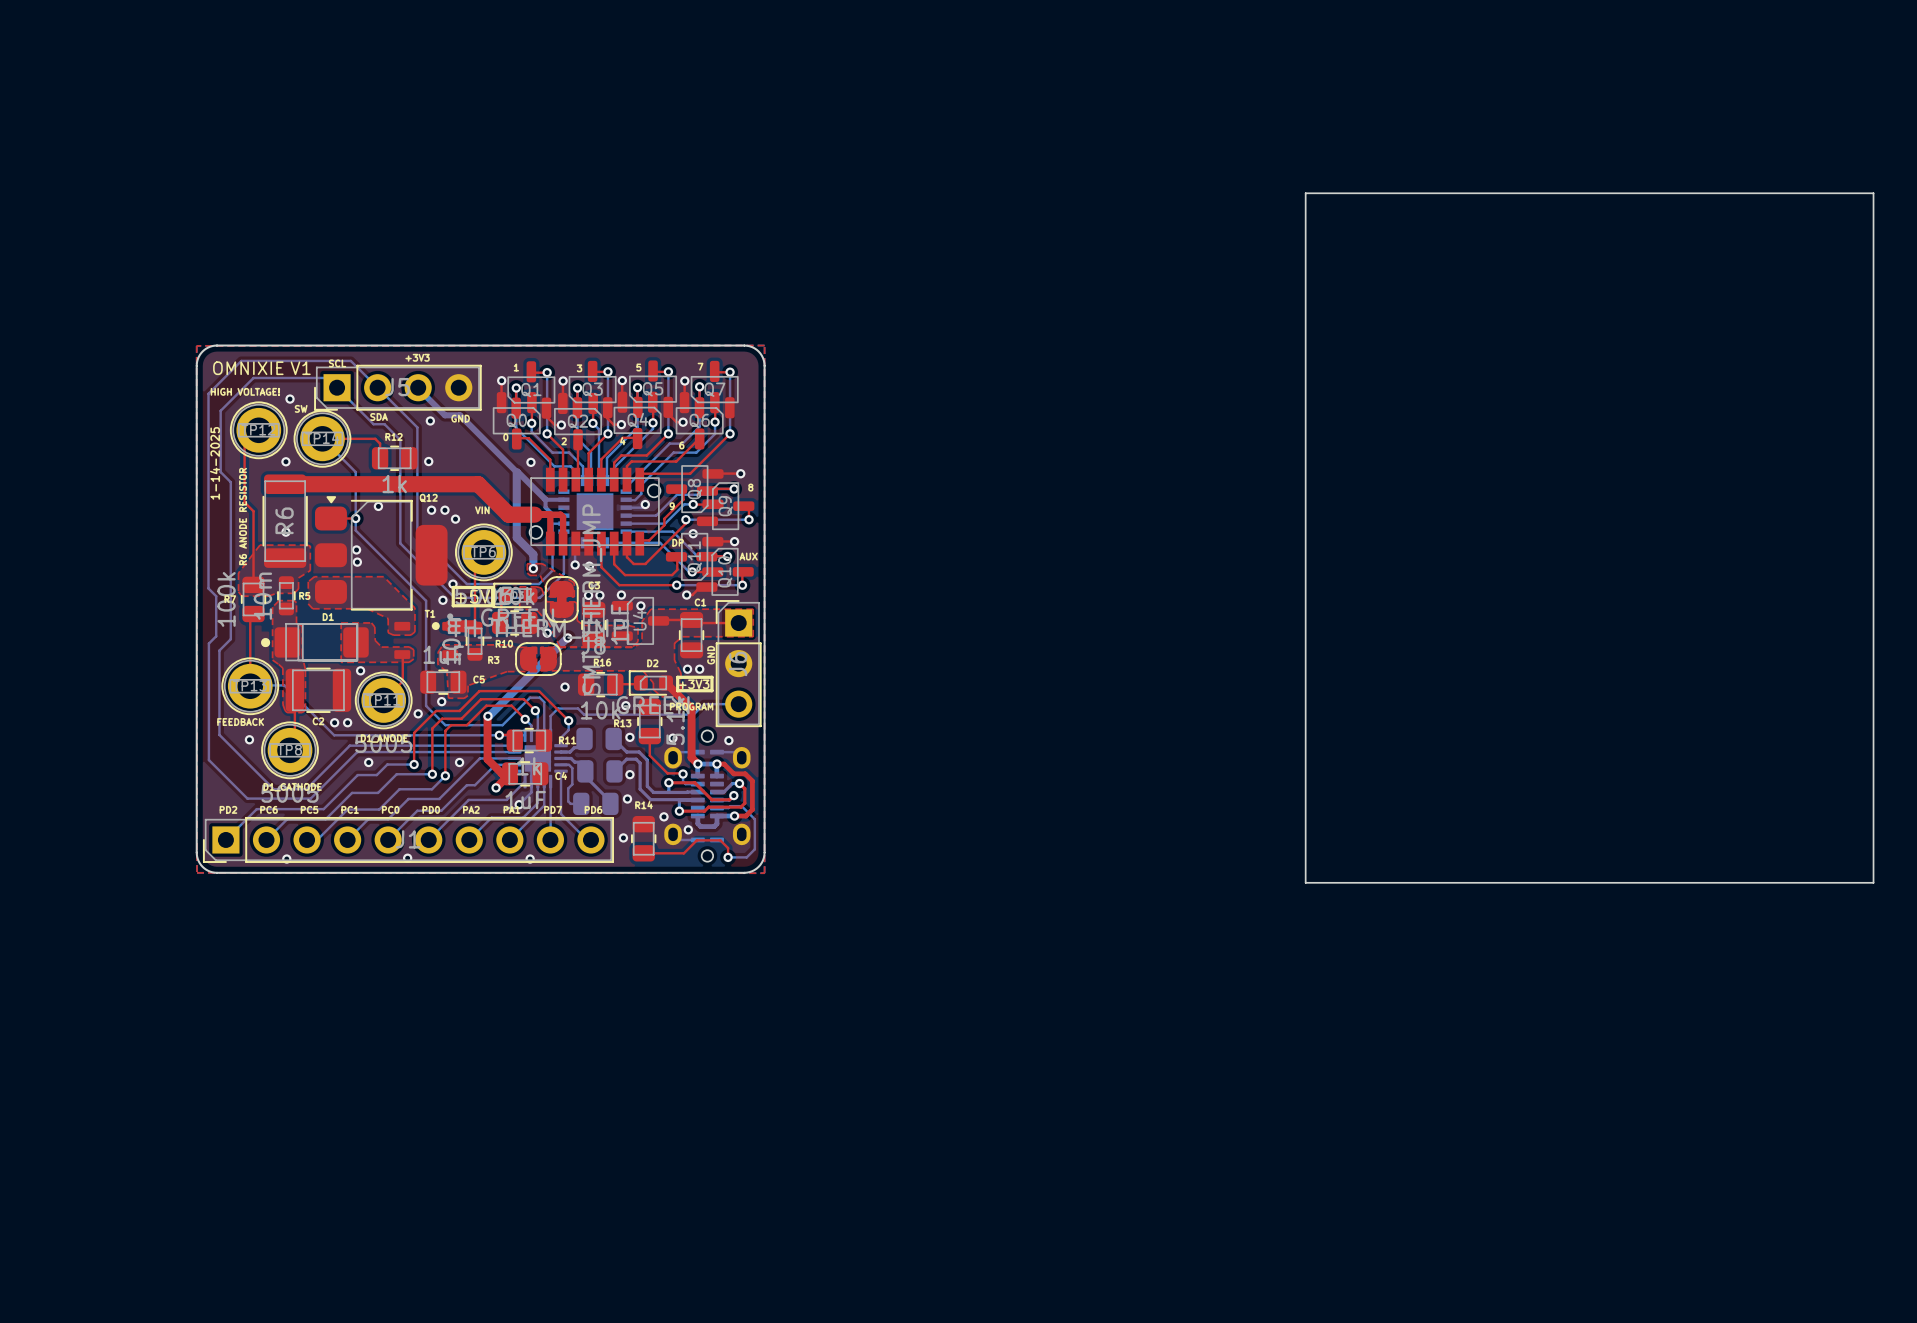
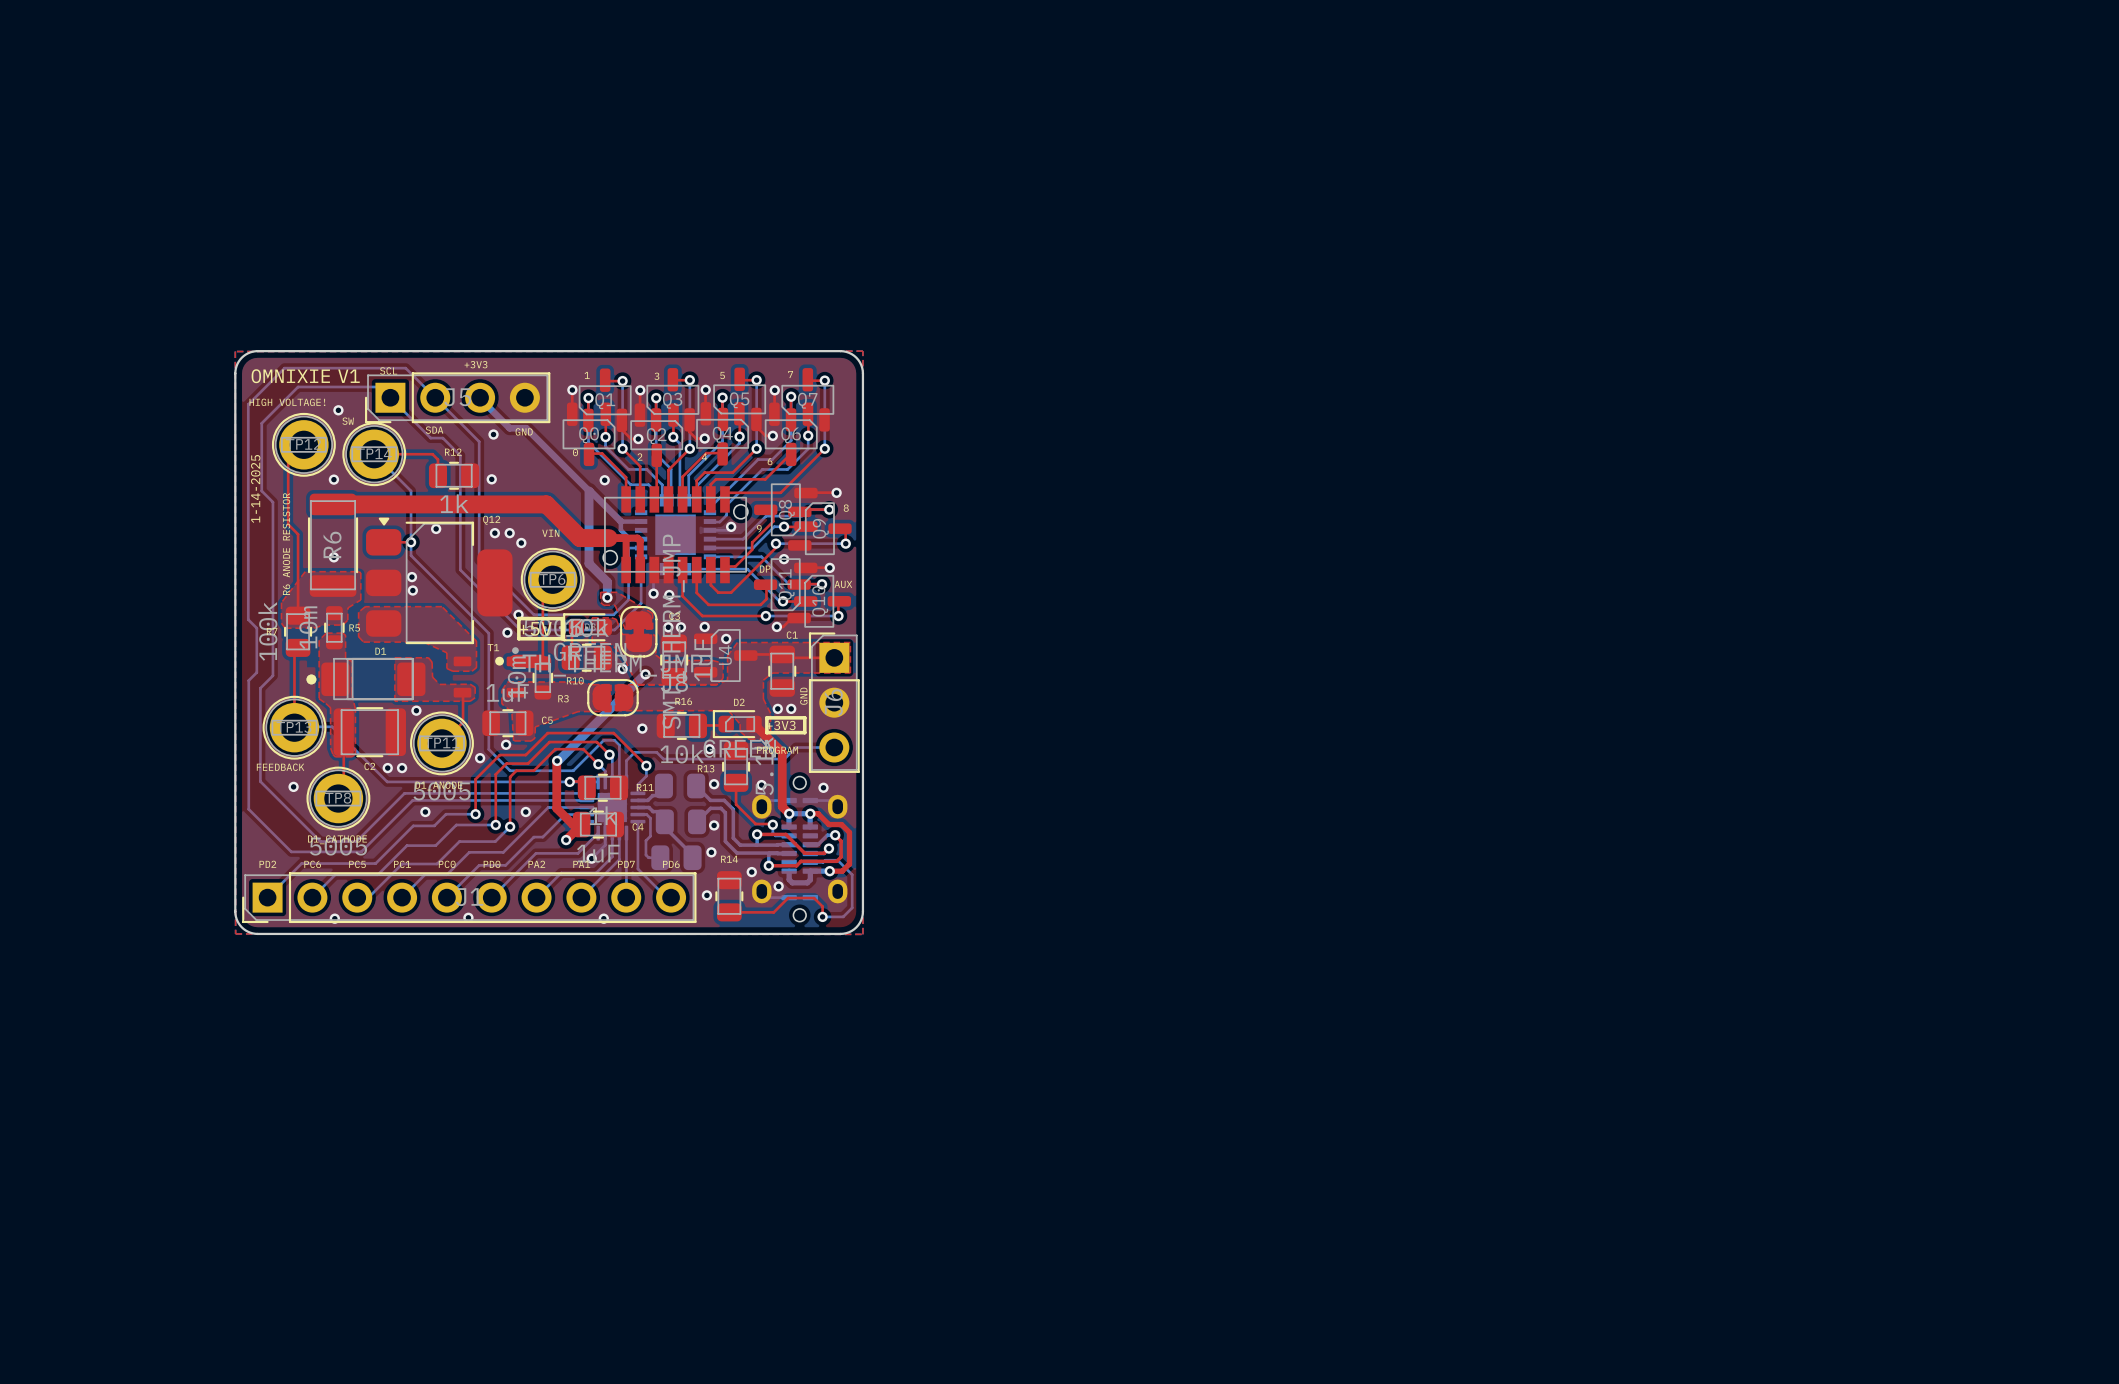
board edge: (1305, 193) (1873, 193) (1873, 882) (1305, 882) (1305, 193) -> none

